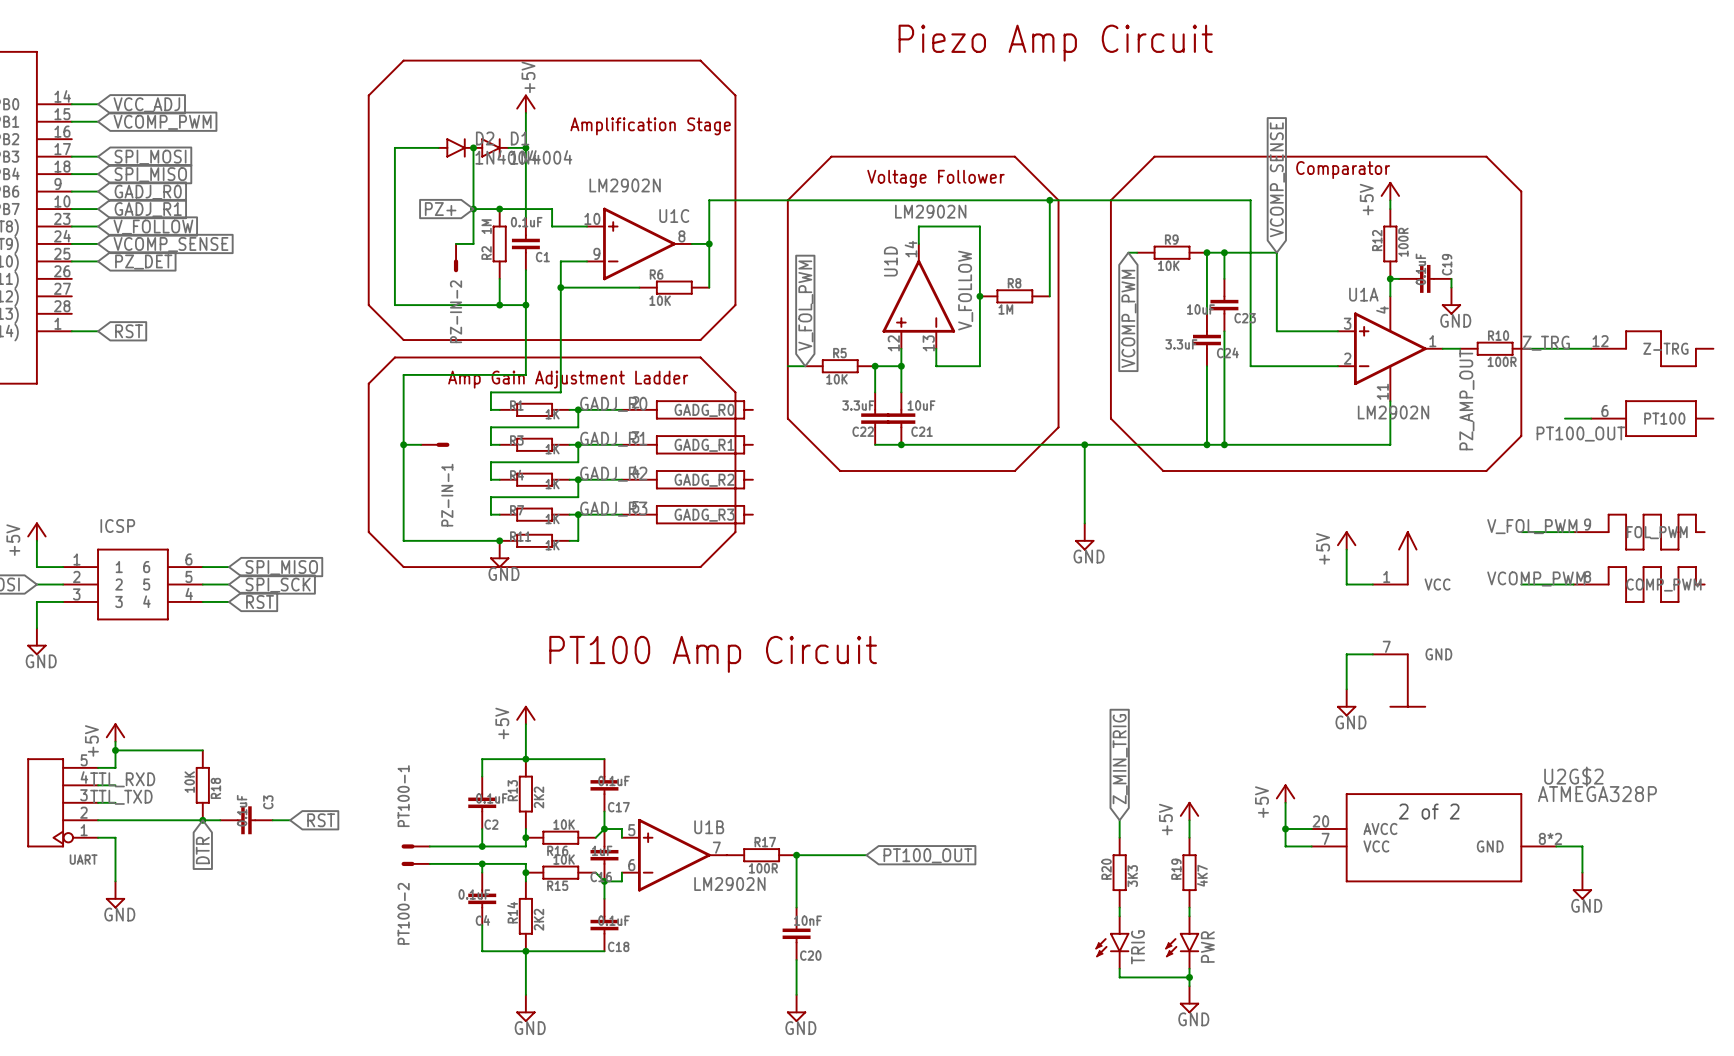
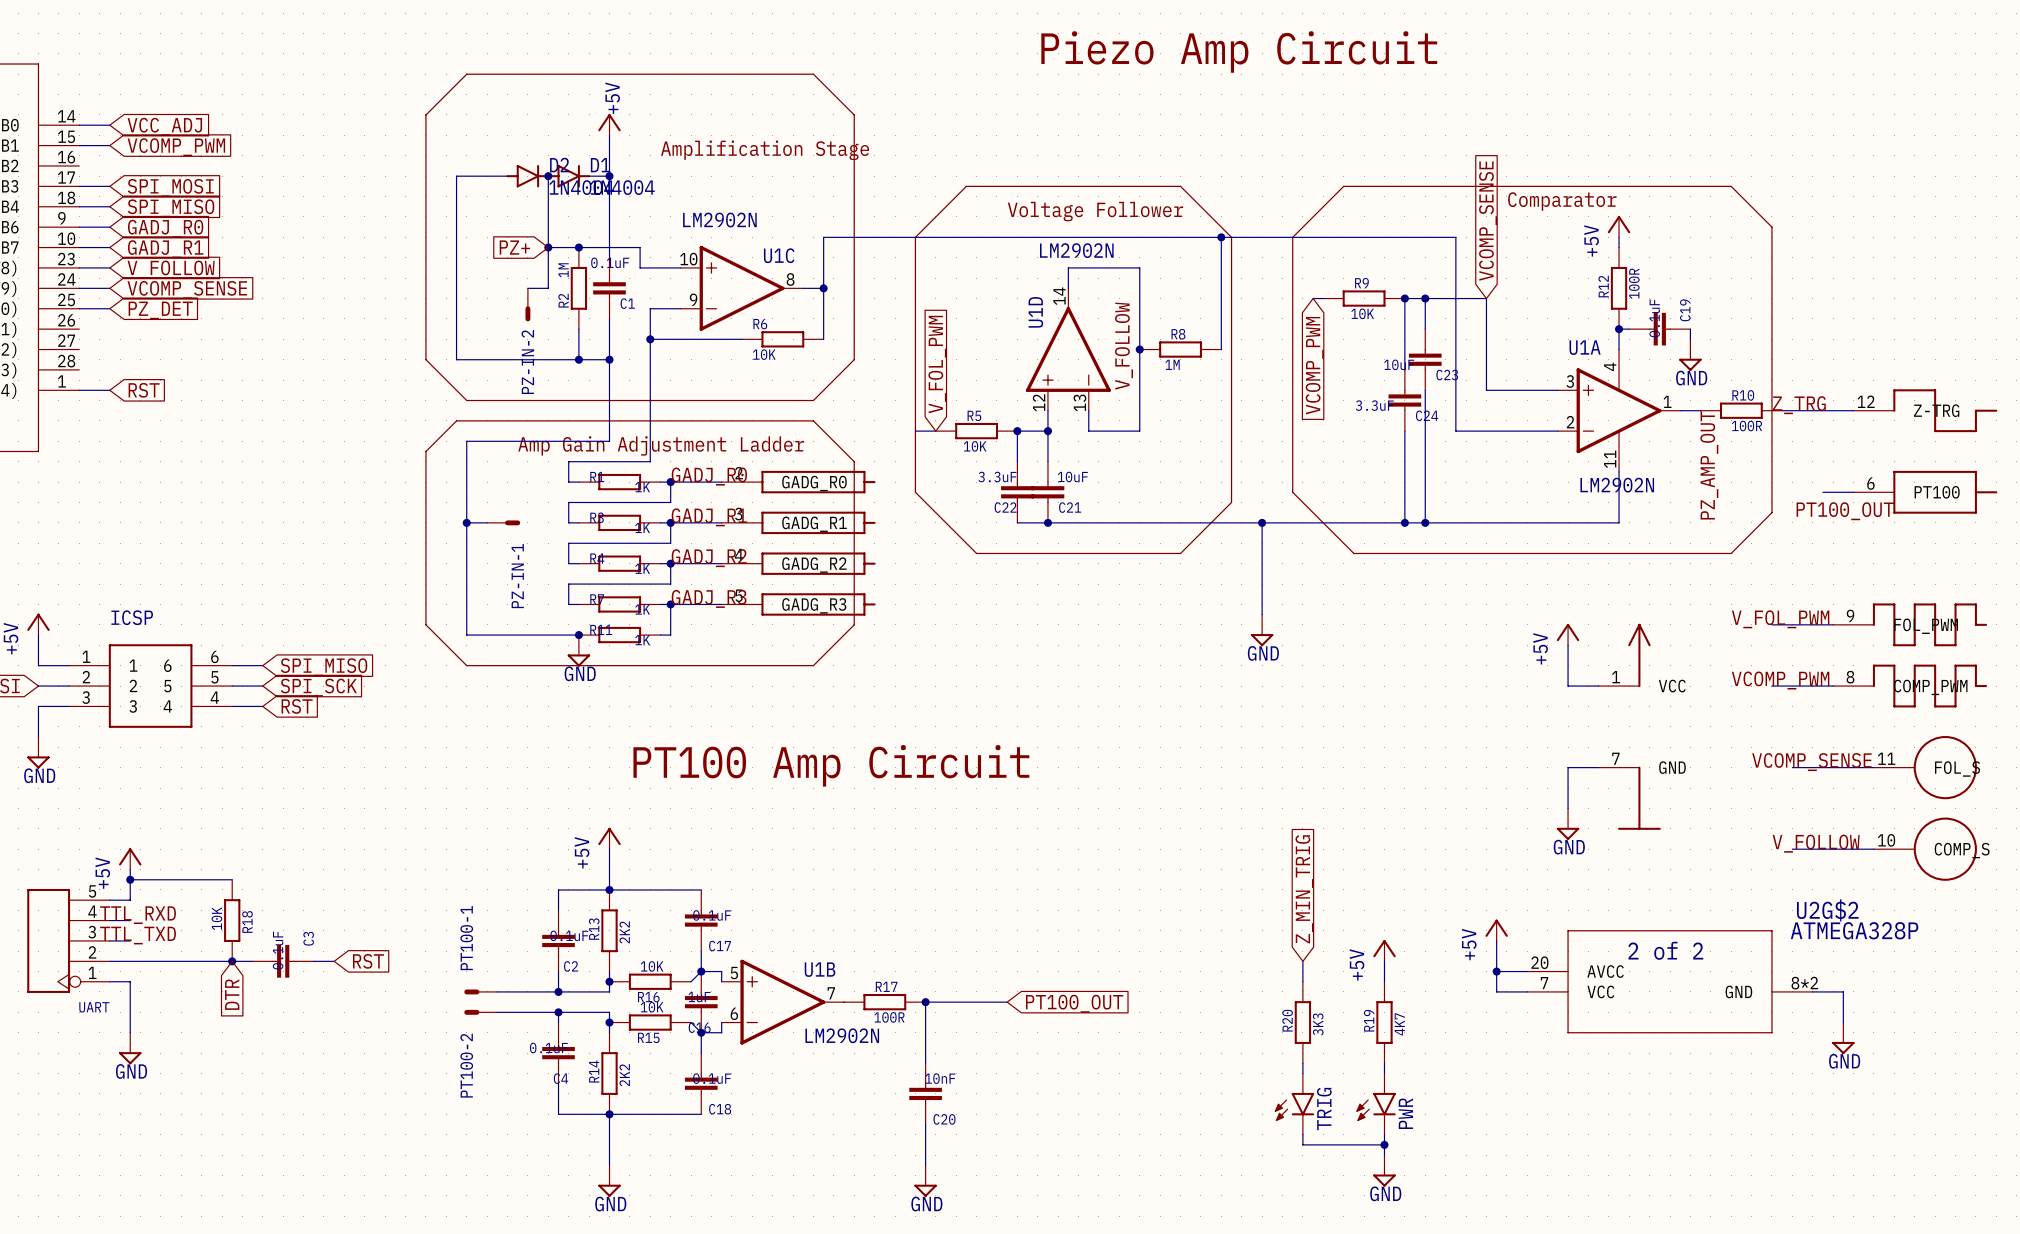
label: none -> VCOMP_SENSE (1811, 762)
wire: none -> (1792, 767) (1873, 767)
part: none -> (1925, 808)
label: none -> V_FOLLOW (1816, 843)
wire: none -> (1792, 849) (1873, 849)

